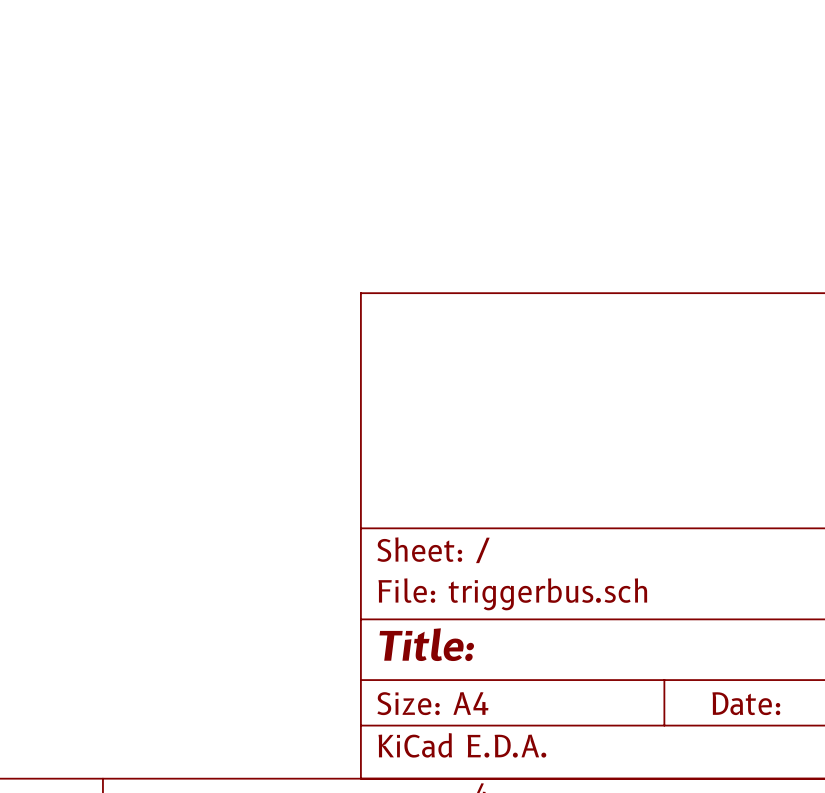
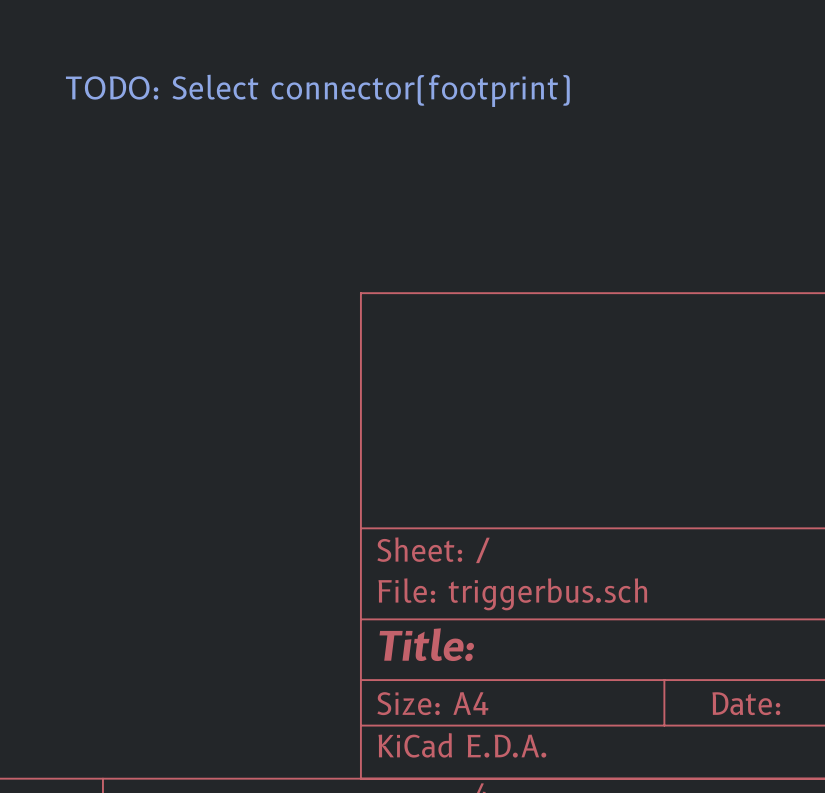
text: none -> TODO: Select connector(footprint) (317, 90)

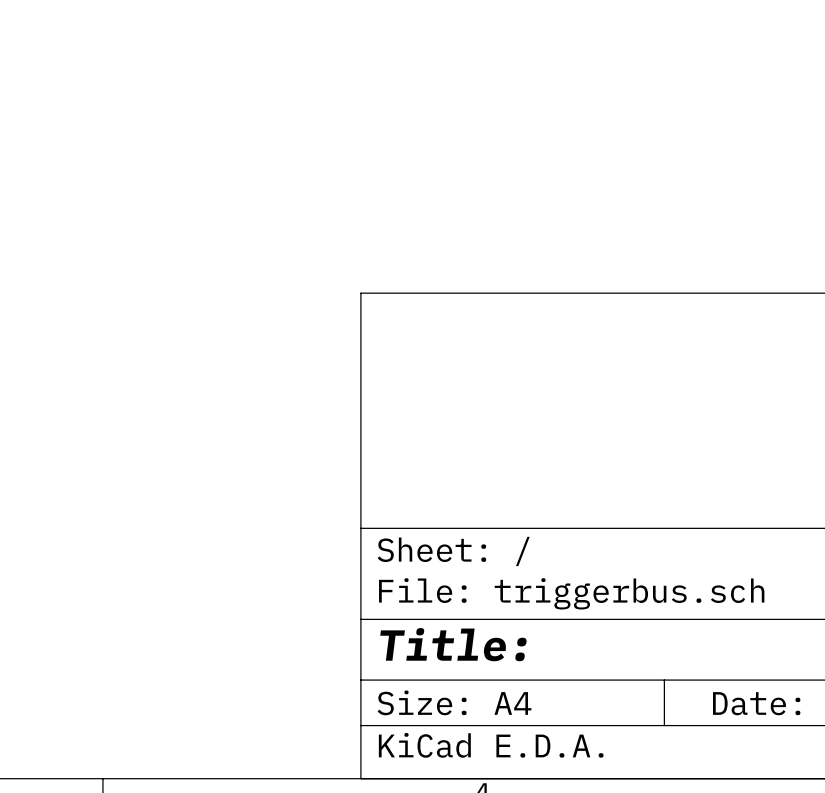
text: TODO: Select connector(footprint) (317, 90) -> none

